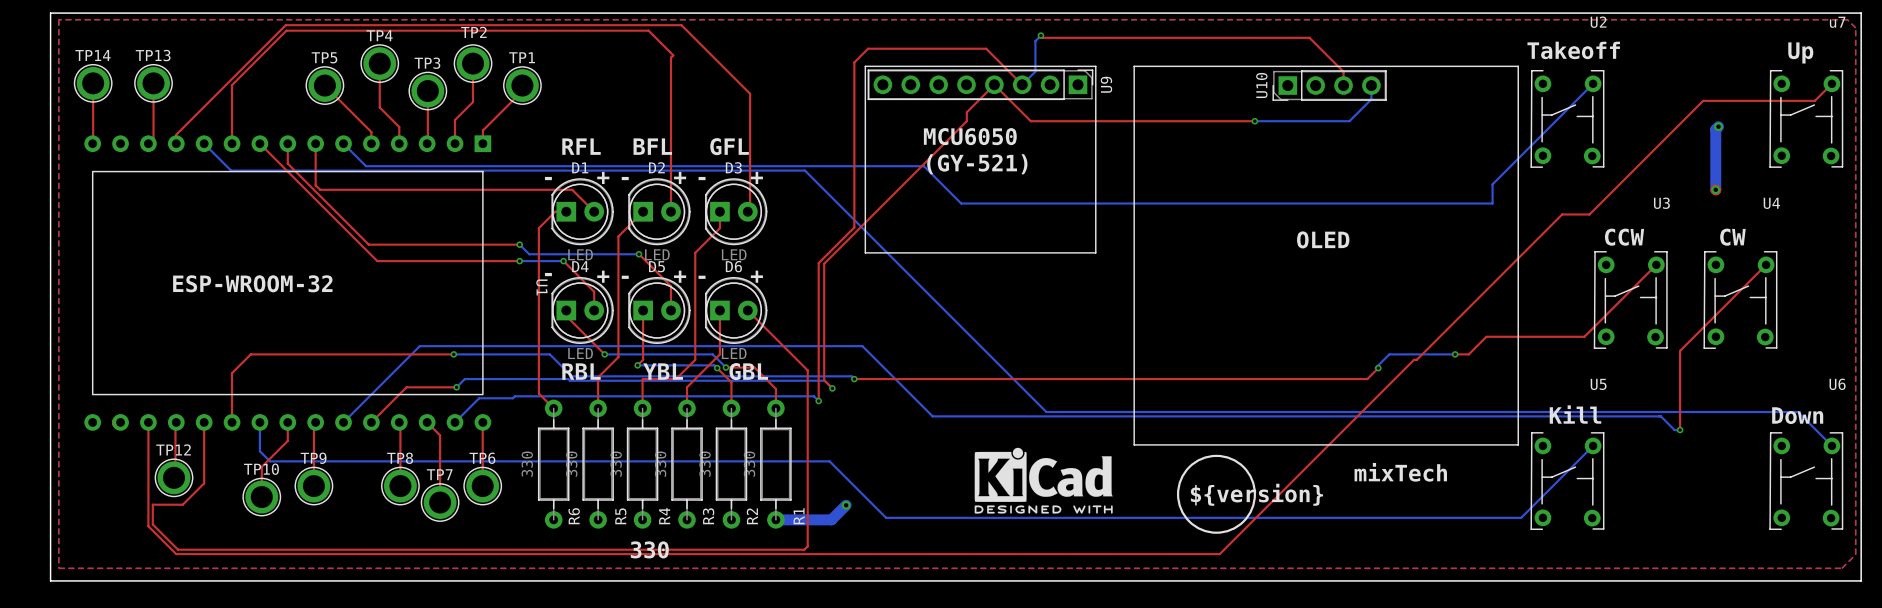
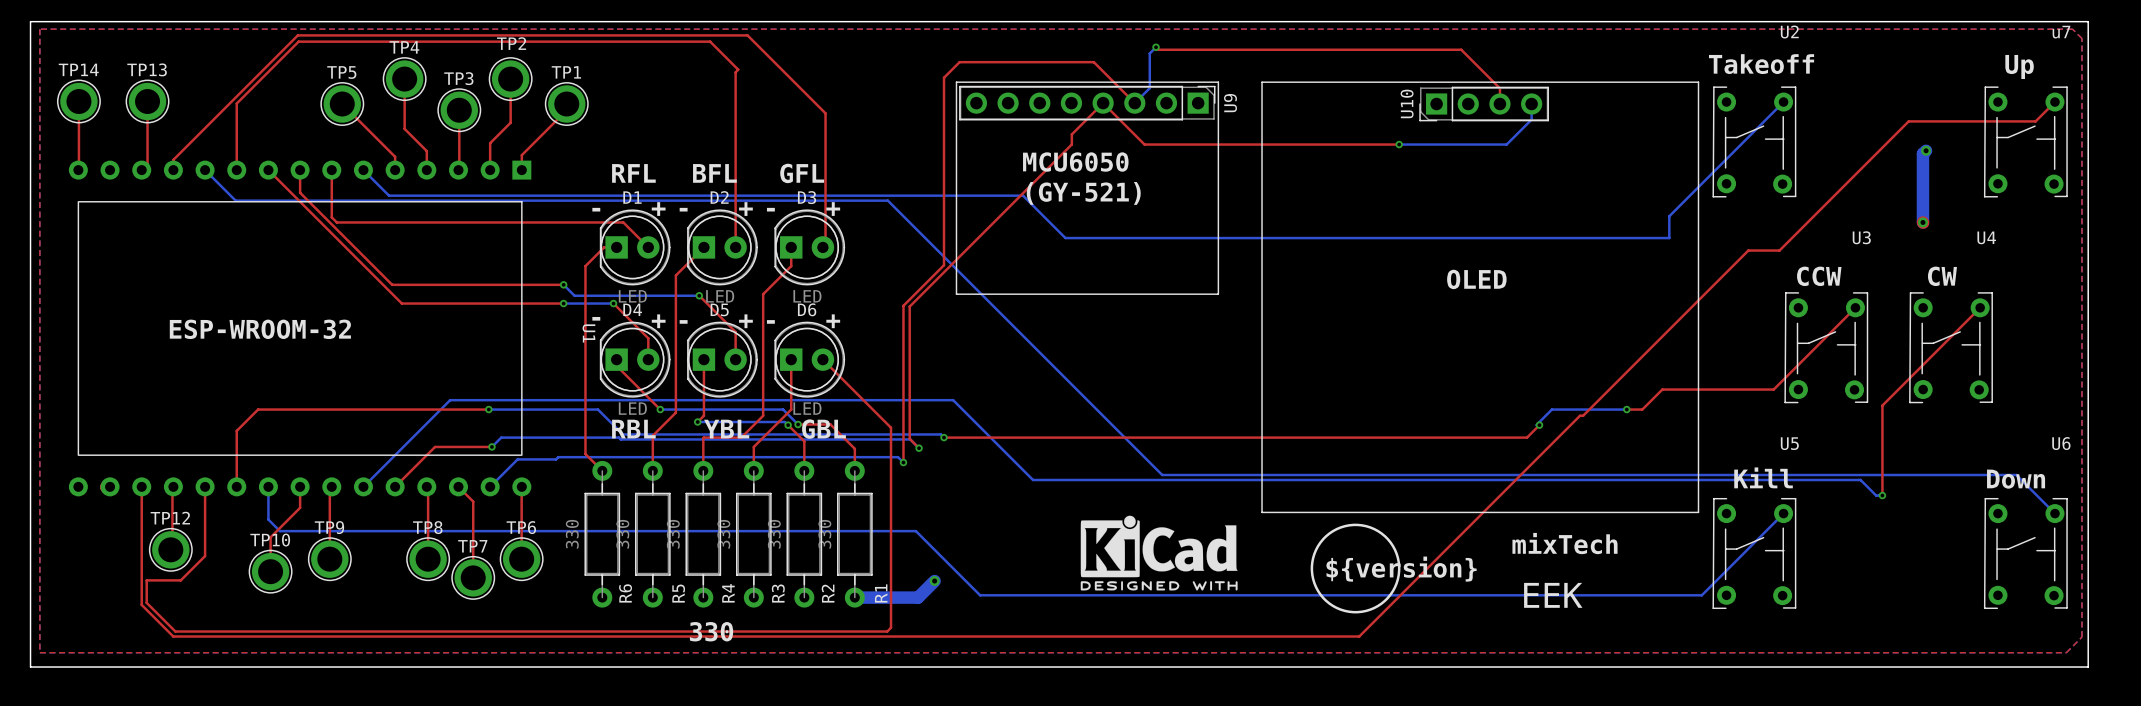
text: none -> EEK (1553, 595)

